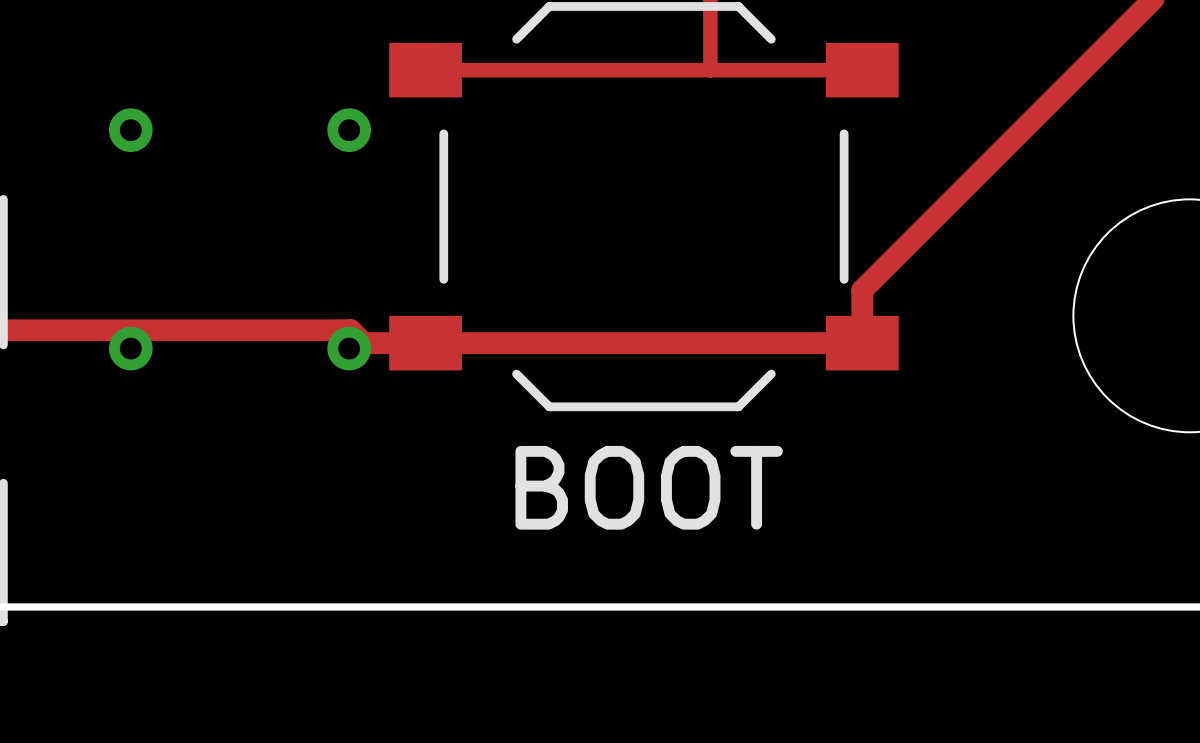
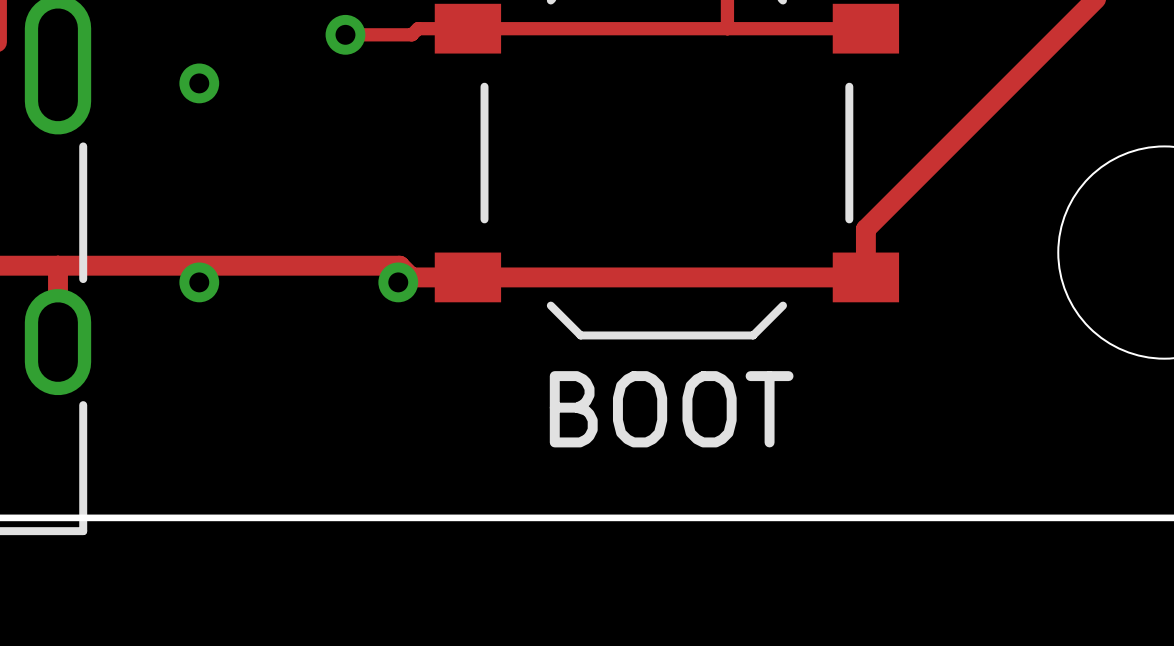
track: none -> (467, 28) (418, 28) (411, 34) (345, 34)
via position: (349, 130) -> (345, 34)

